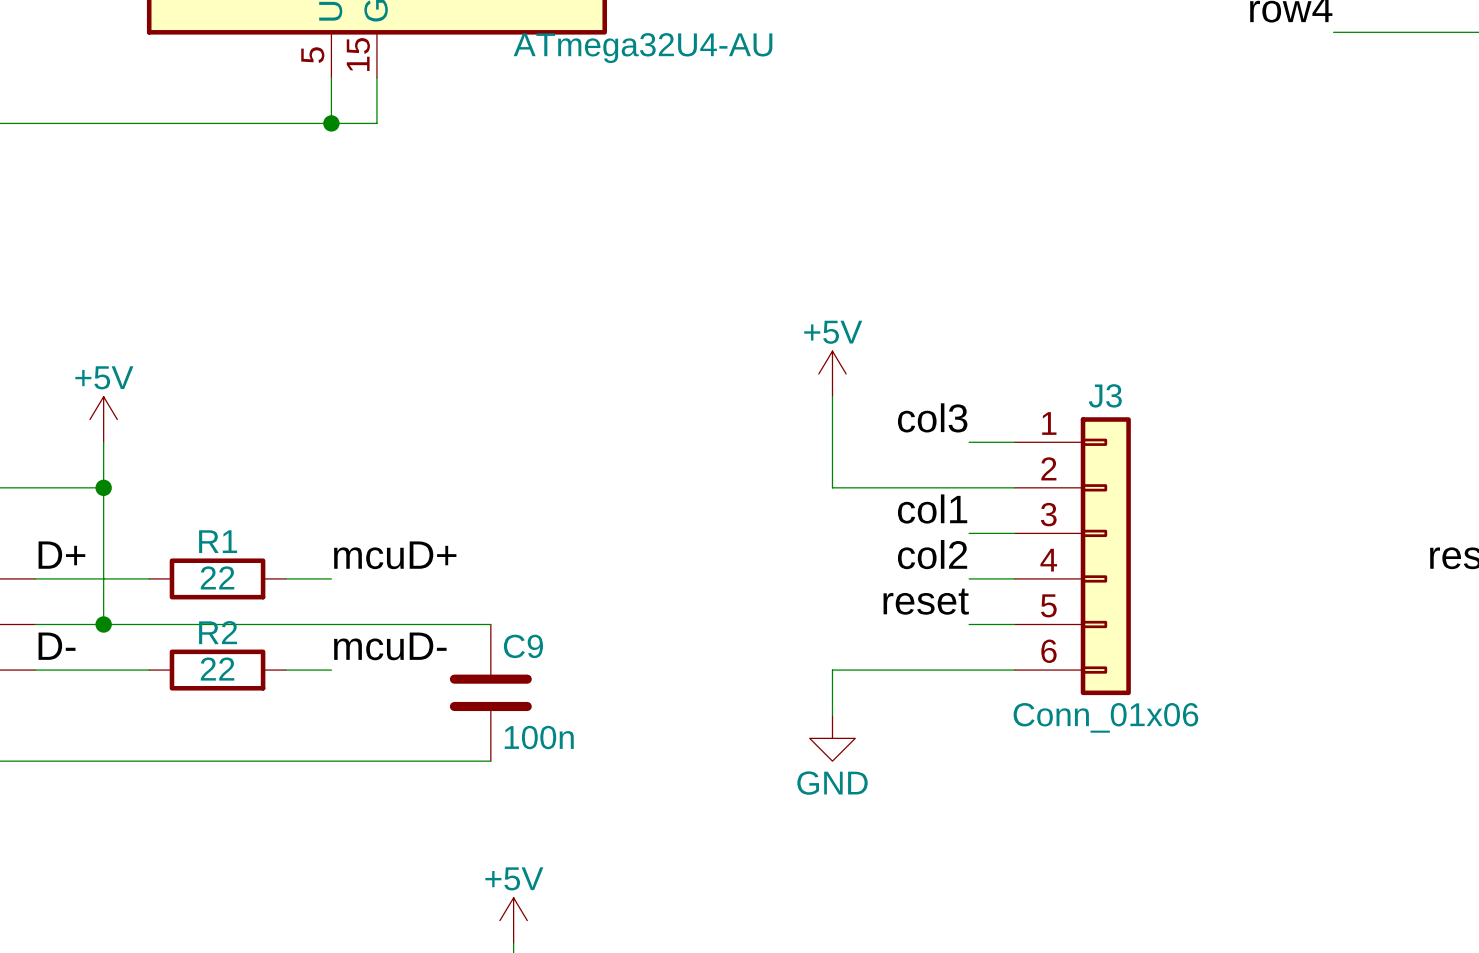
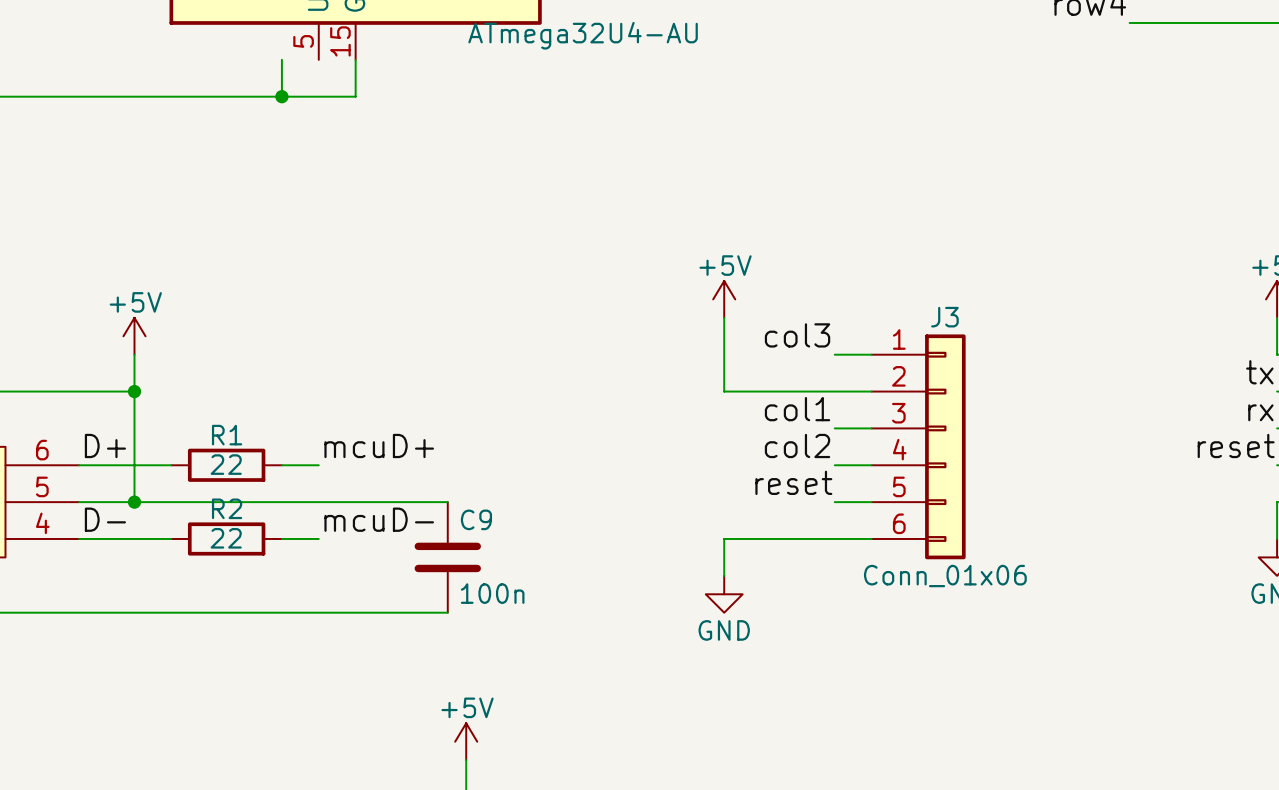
wire: (331, 77) (331, 123) -> (281, 59) (281, 96)
junction position: (331, 123) -> (281, 96)

